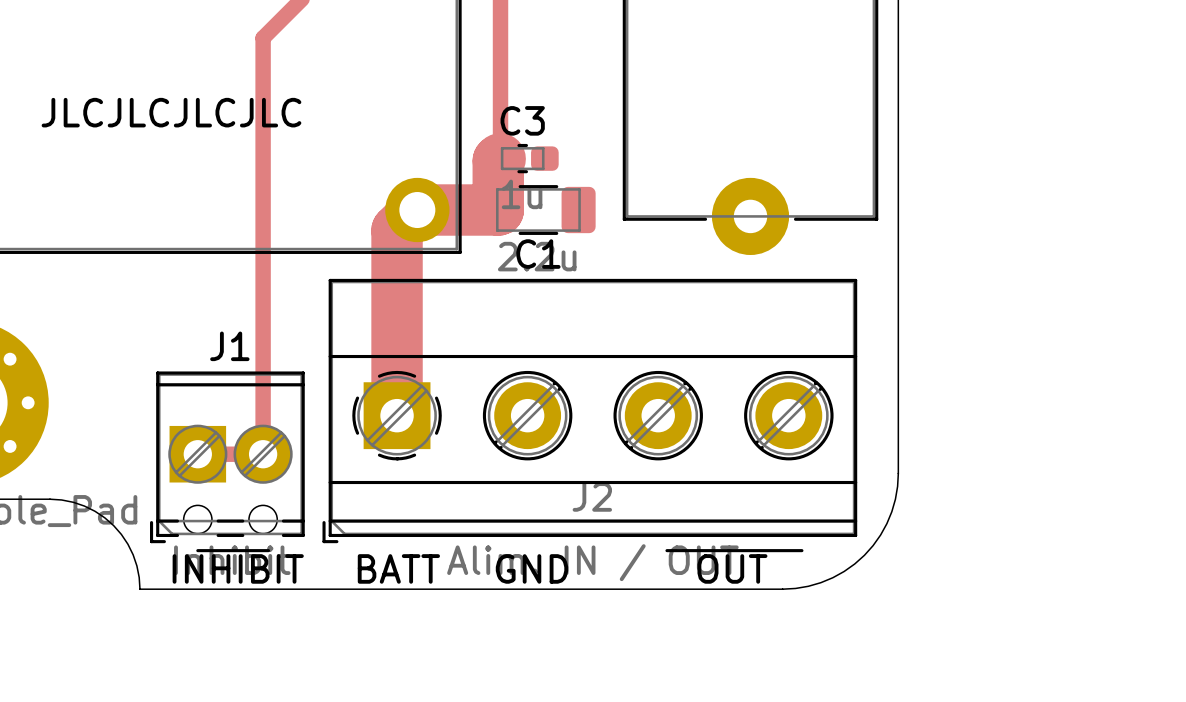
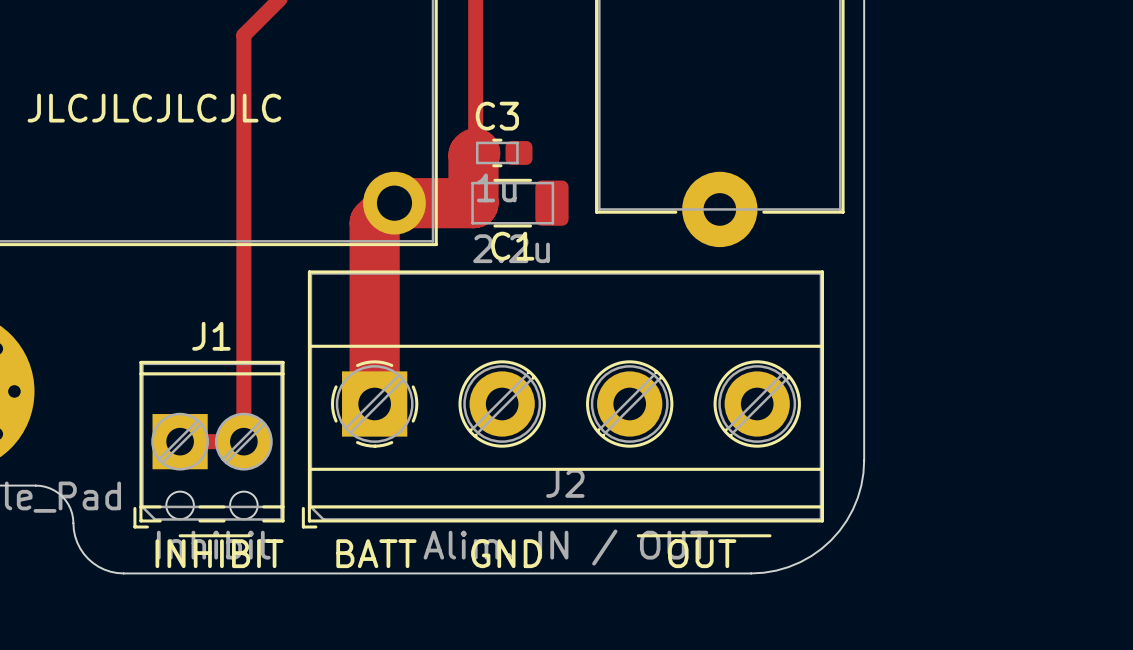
board edge: (49, 499) (73, 502) (84, 506) (104, 517) (113, 525) (121, 534) (133, 554) (136, 565) (139, 589) -> (35, 485) (50, 488) (65, 500) (72, 513) (77, 542) (88, 558) (104, 569) (123, 573)

